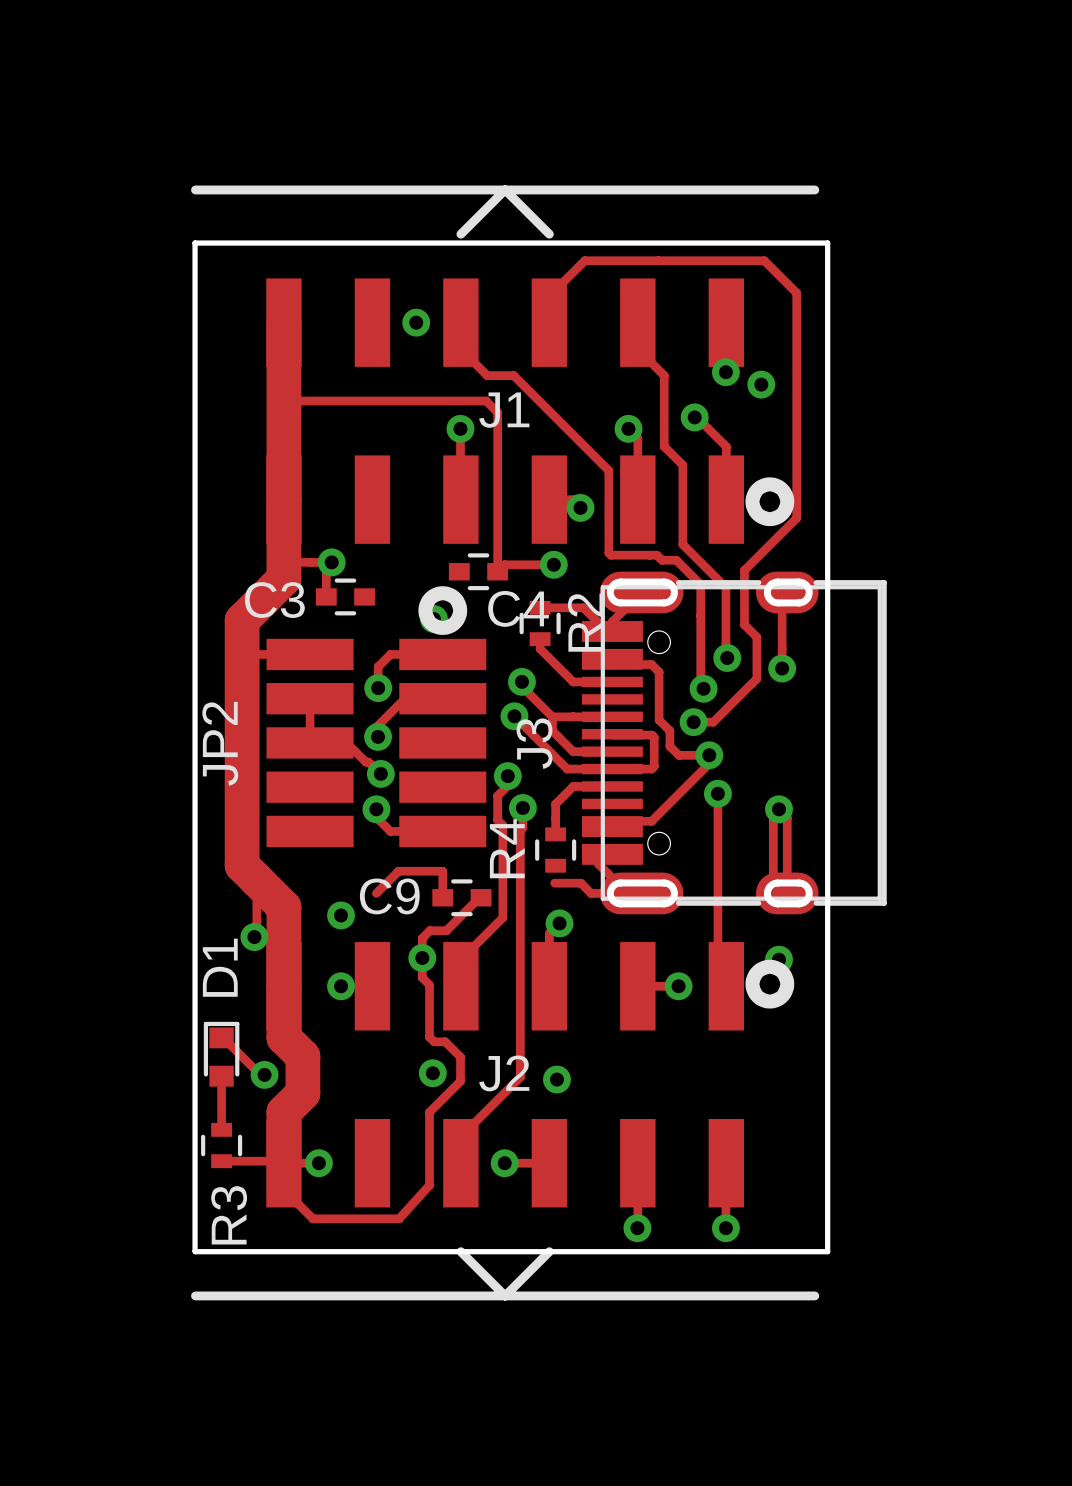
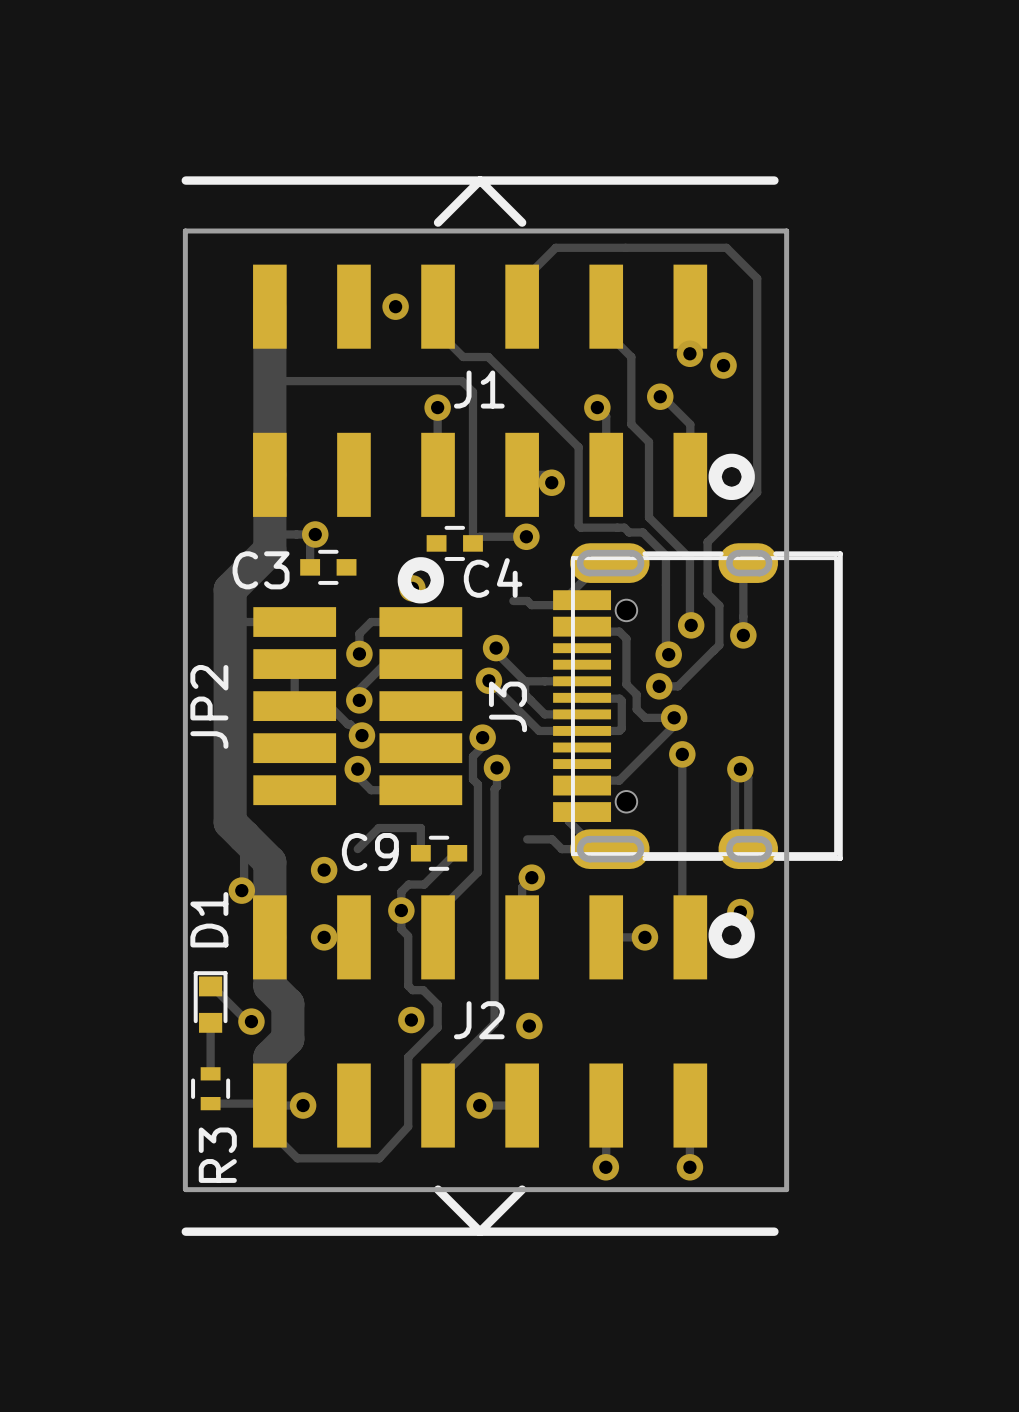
track: (641, 592) (612, 621) (612, 636) (583, 607) (540, 607) -> none
track: none -> (596, 567) (568, 595) (568, 605) (531, 605) (527, 601) (513, 601)
R2: (540, 623) -> none
track: (540, 648) (573, 681) (612, 681) -> none
track: (612, 786) (573, 786) (555, 804) (555, 834) -> none
R4: (555, 850) -> none

